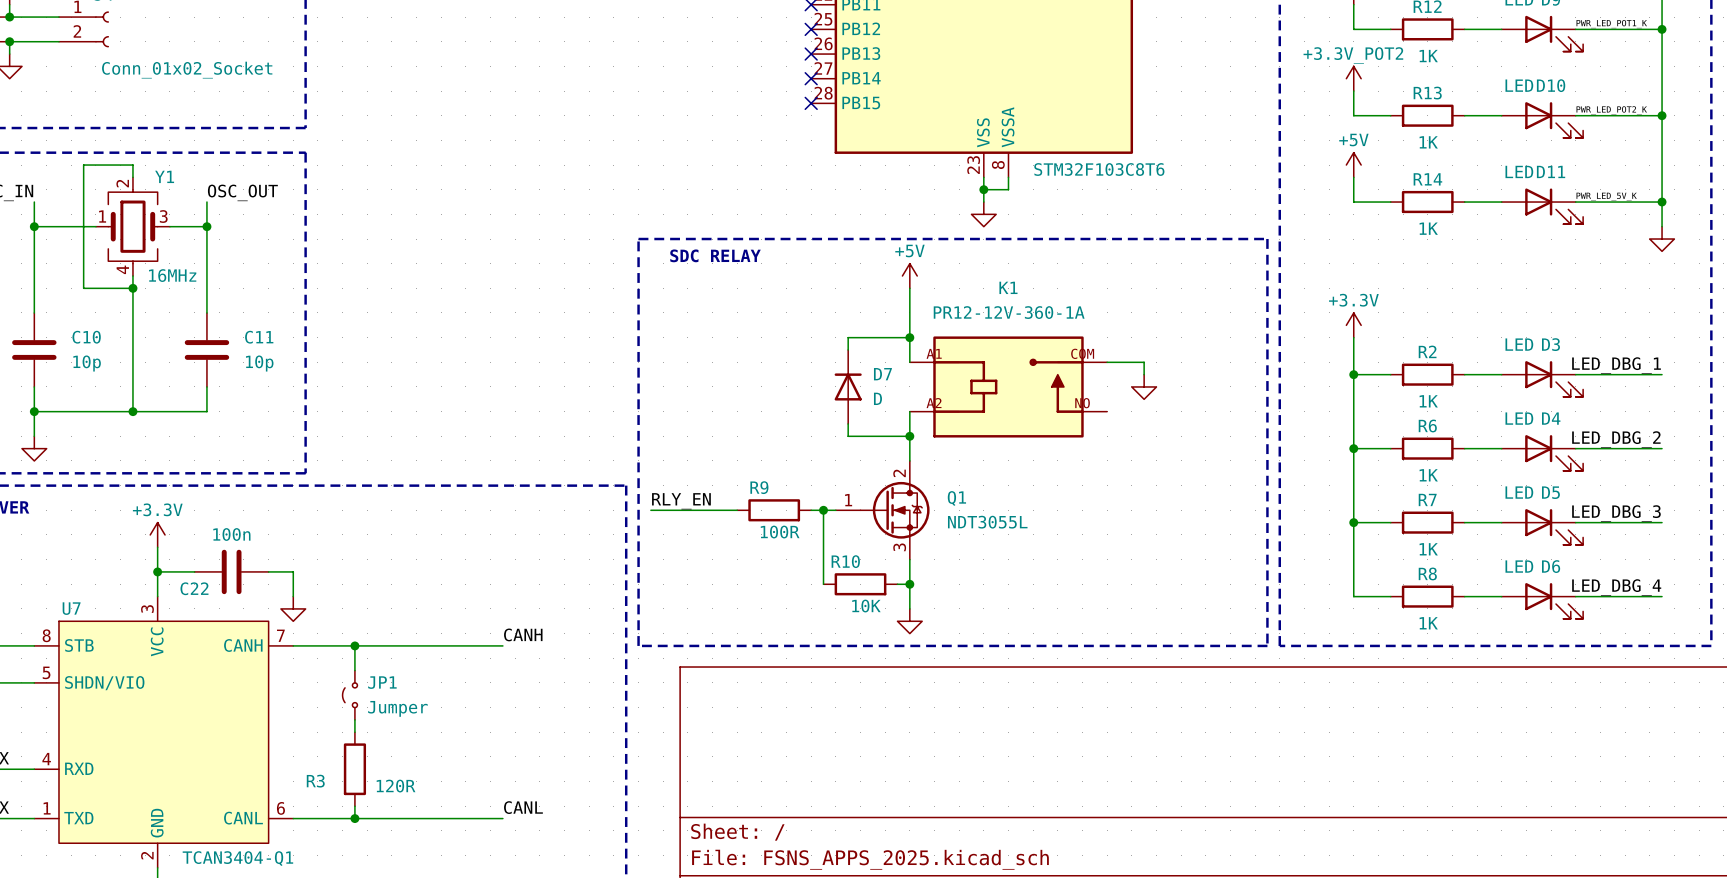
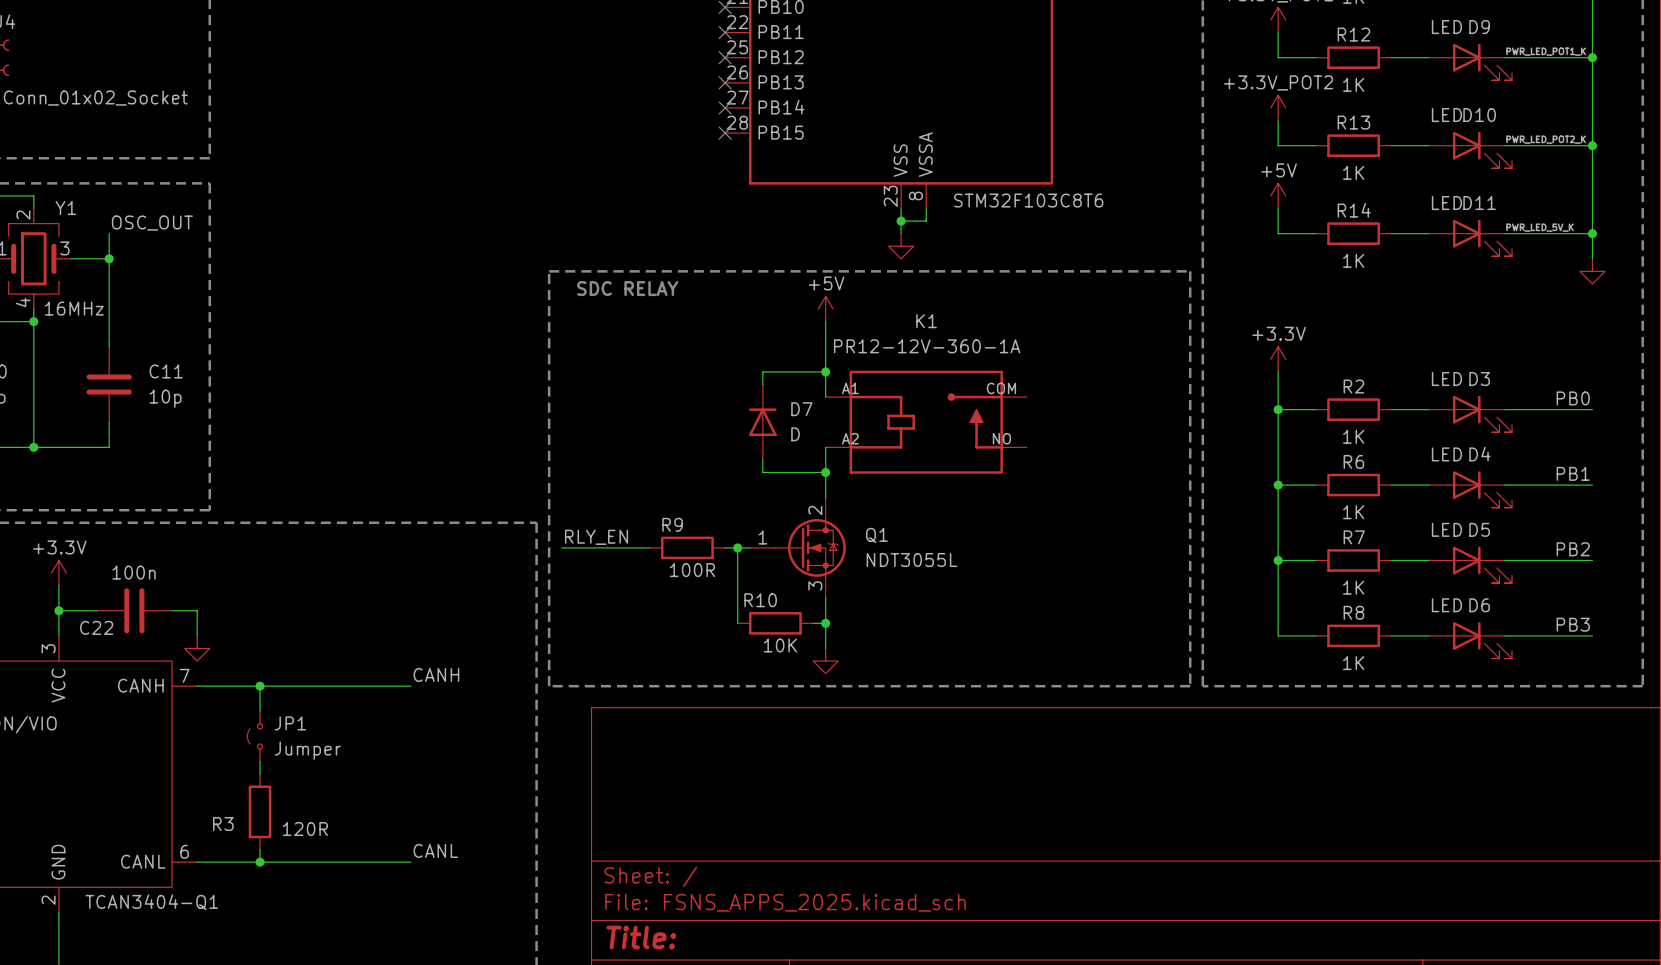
wire: (1107, 362) (1144, 362) (1144, 374) -> none
label: LED_DBG_1 (1616, 365) -> PB0 (1573, 398)
power symbol: (1144, 386) -> none
label: LED_DBG_2 (1616, 439) -> PB1 (1573, 473)
label: LED_DBG_3 (1616, 513) -> PB2 (1573, 549)
label: LED_DBG_4 (1616, 587) -> PB3 (1573, 624)

